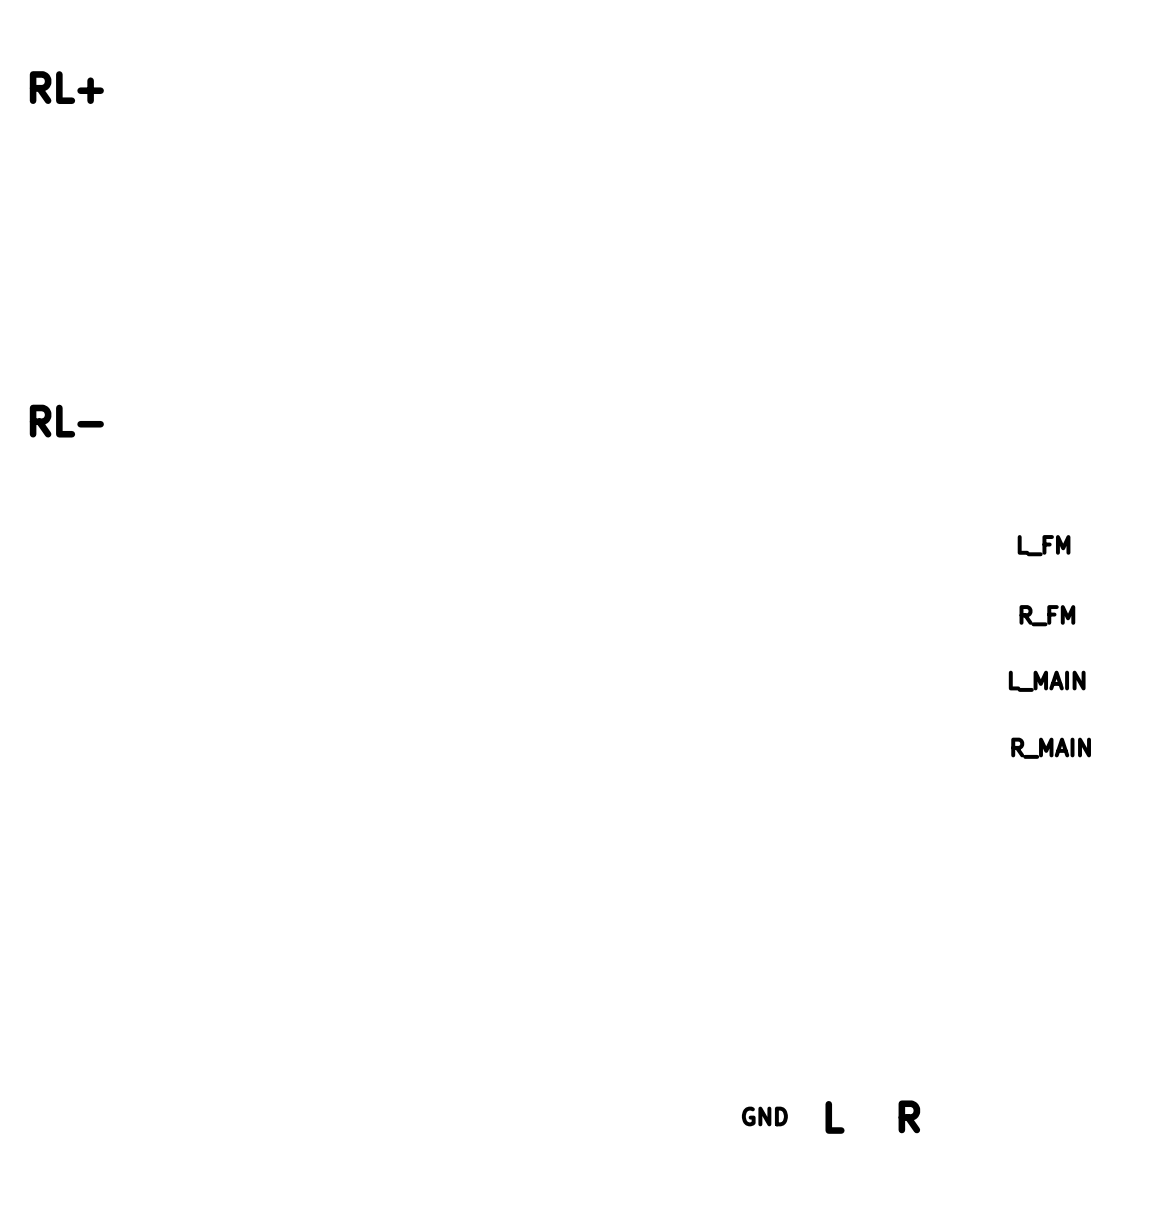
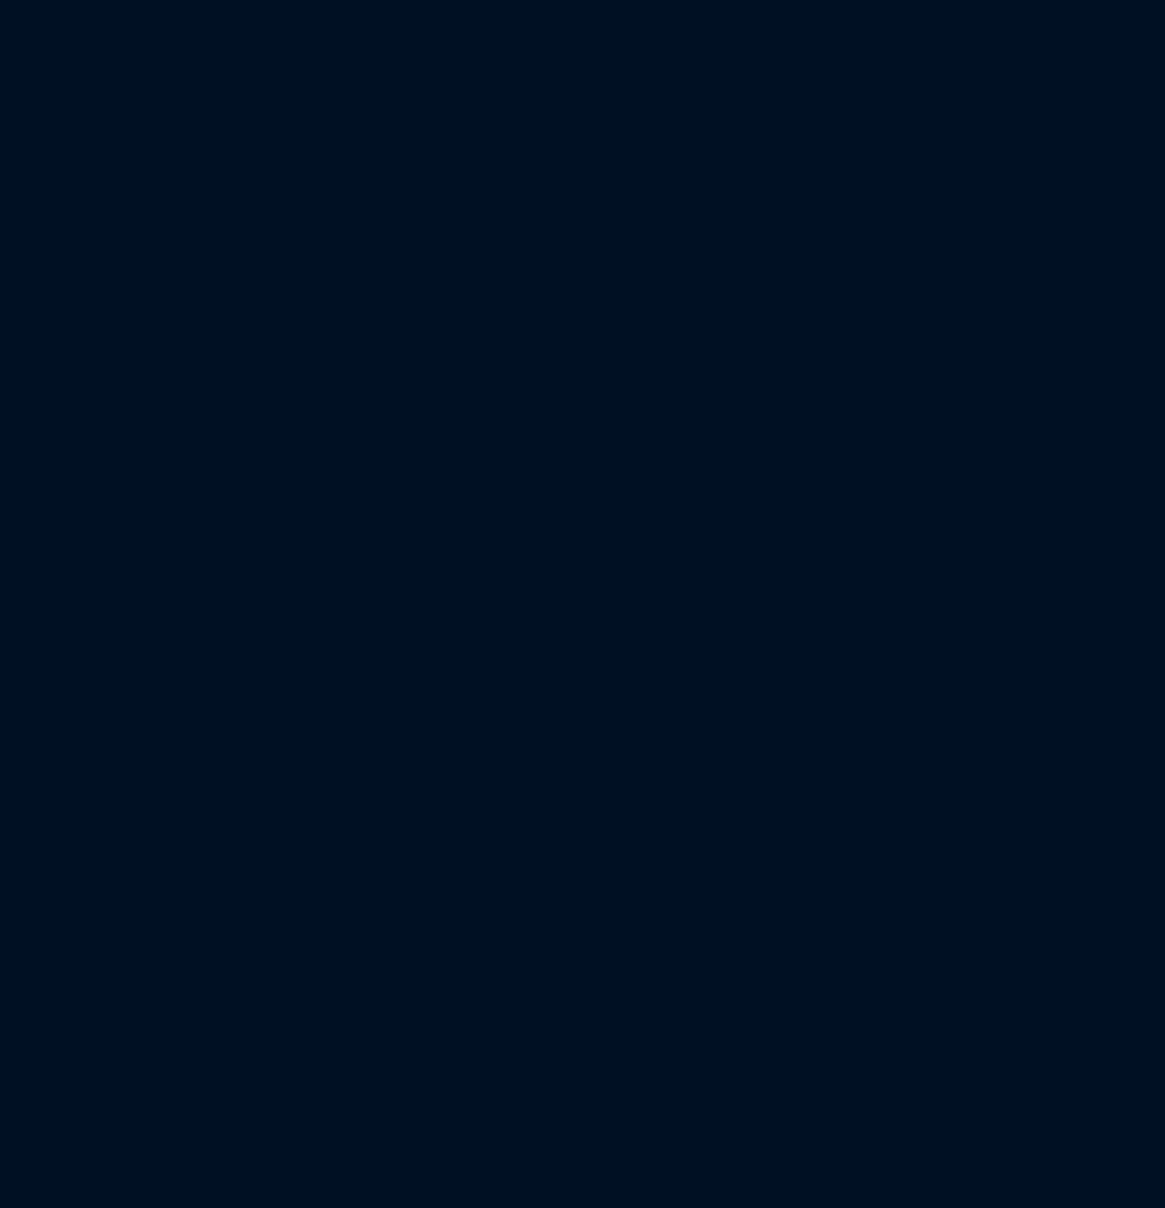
text: RL+ (66, 87) -> none
text: RL- (66, 421) -> none
text: L_FM (1044, 545) -> none
text: R_FM (1047, 615) -> none
text: L_MAIN (1047, 681) -> none
text: R_MAIN (1051, 748) -> none
text: GND (764, 1116) -> none
text: R (909, 1116) -> none
text: L (835, 1117) -> none

